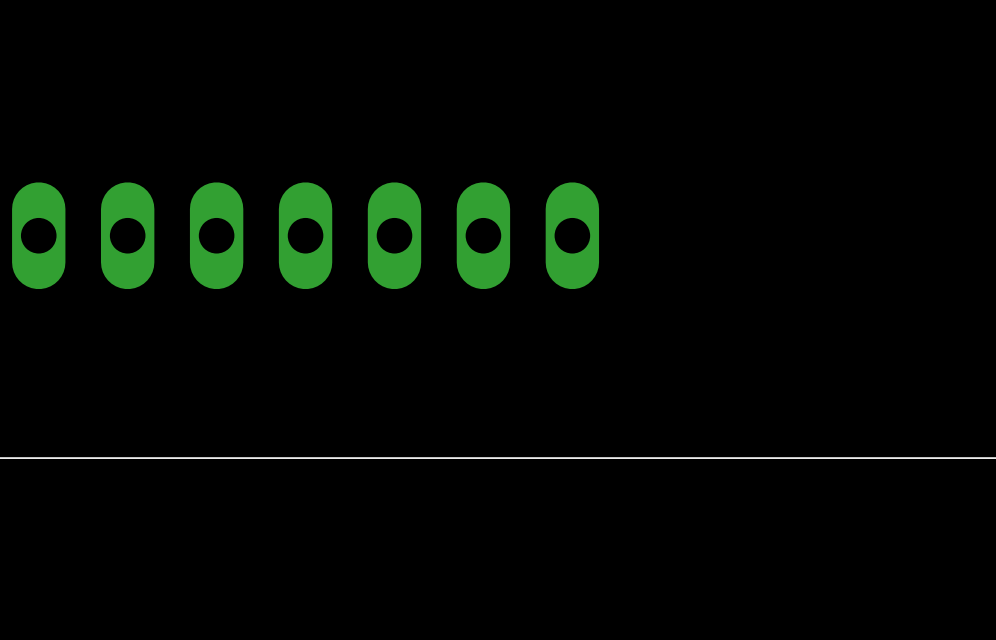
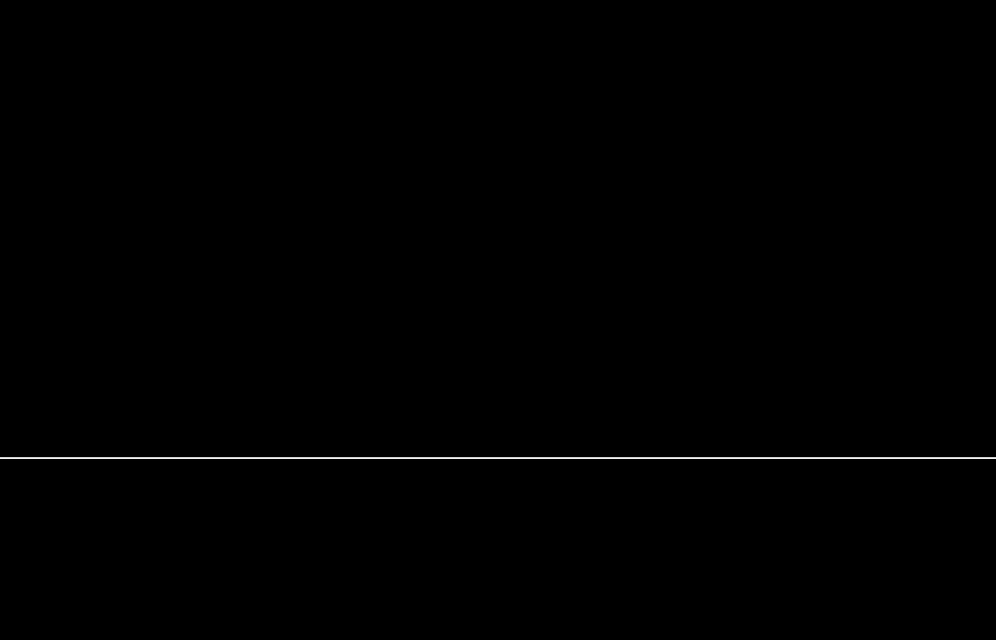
part: (305, 235) -> none

